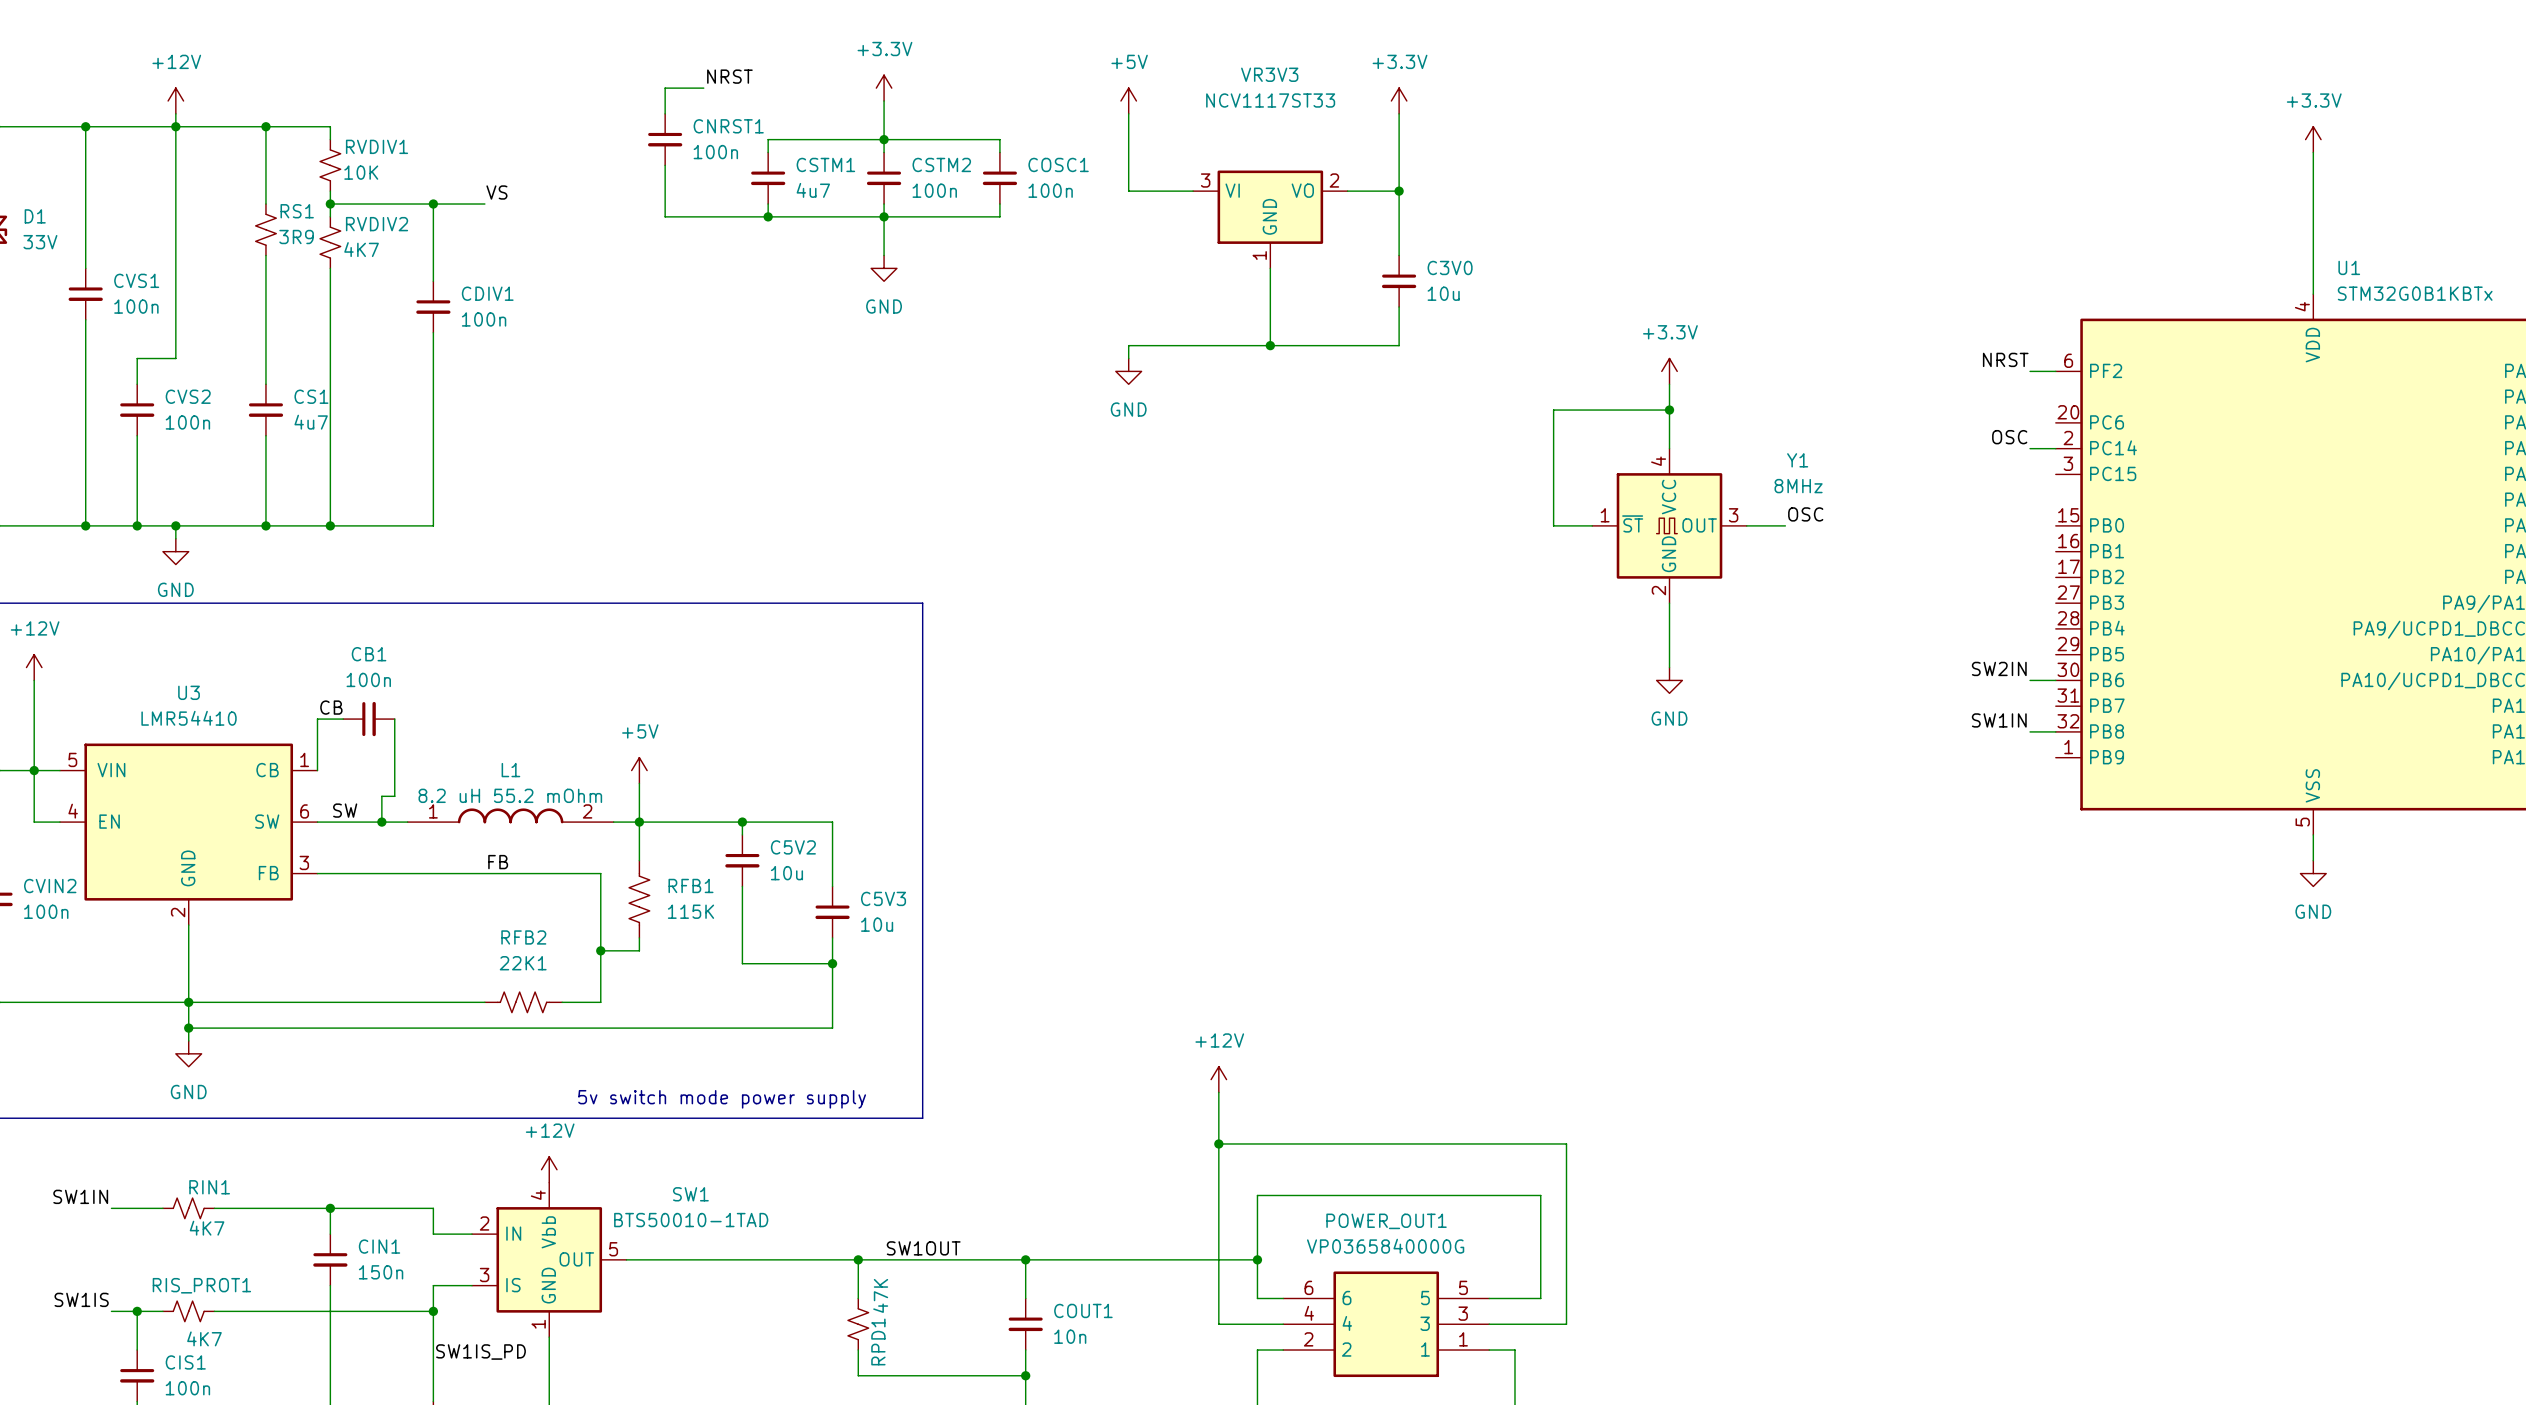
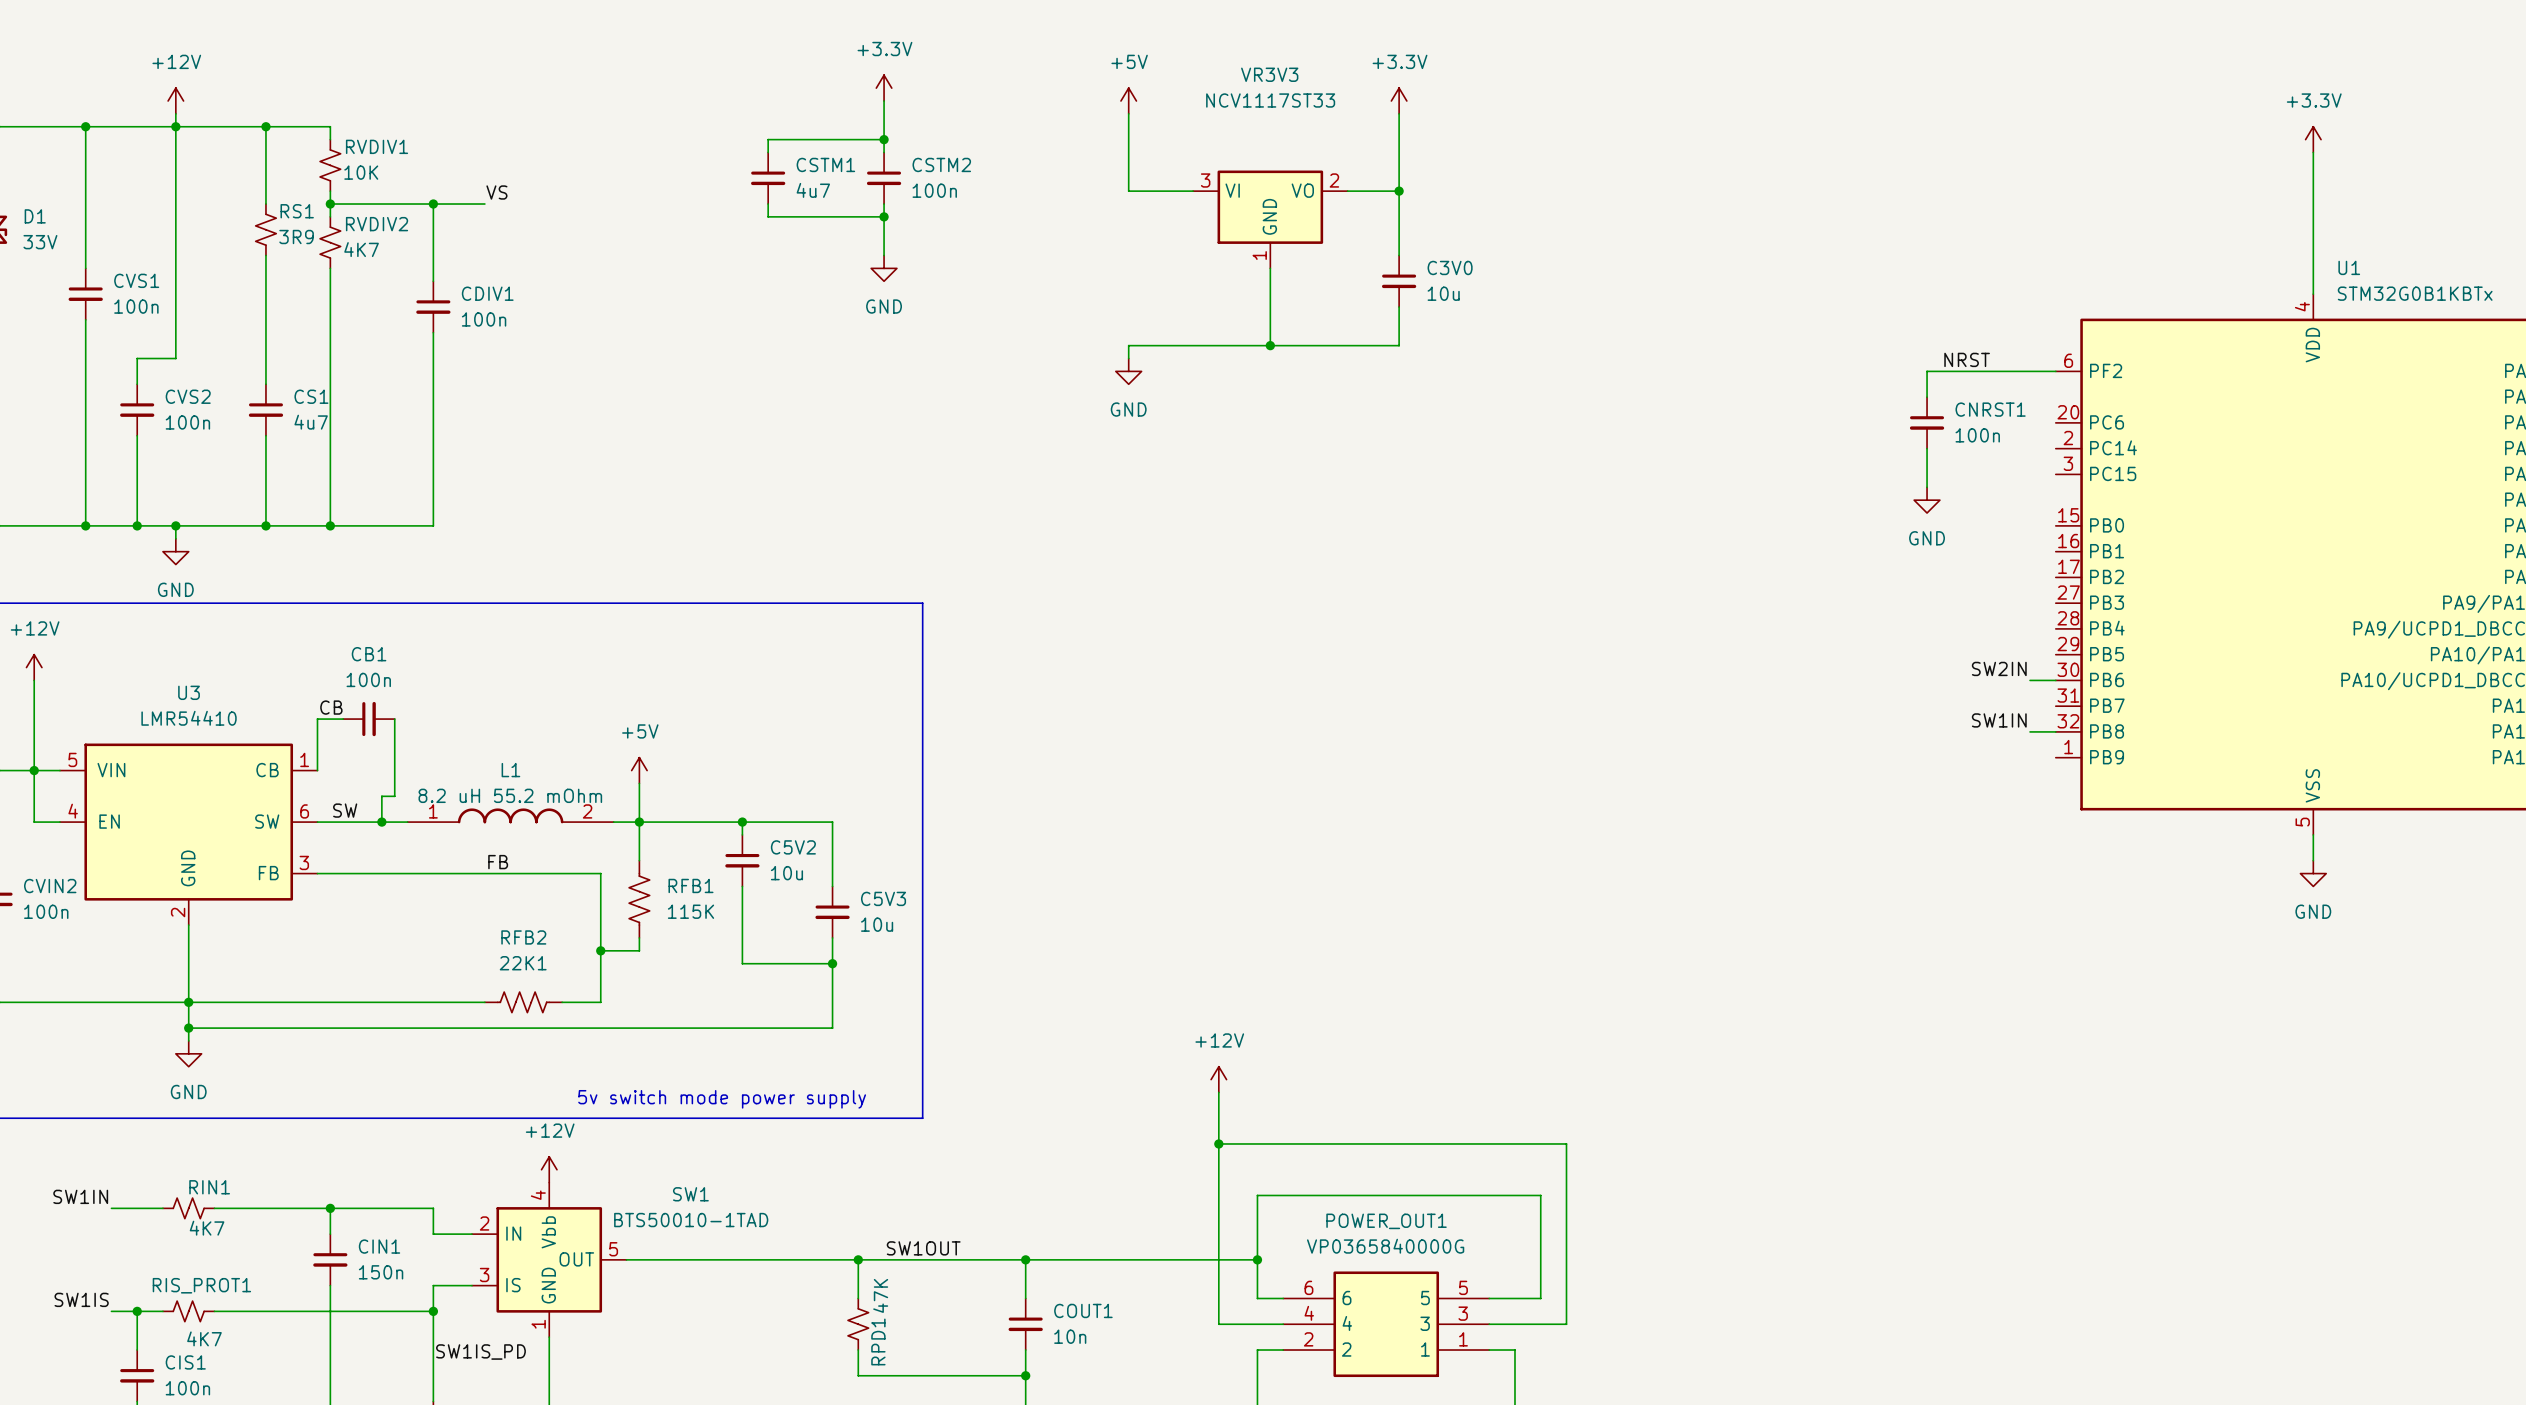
label: NRST (729, 76) -> none
wire: (703, 88) (665, 88) (665, 113) -> none
CNRST1 position: (665, 139) -> (1927, 422)
wire: (884, 139) (999, 139) (999, 152) -> none
wire: (665, 165) (665, 216) (768, 216) -> none
COSC1: 100n (999, 178) -> none
wire: (999, 204) (999, 216) (884, 216) -> none
junction: (768, 216) -> none
label position: NRST (2005, 359) -> NRST (1967, 359)
power symbol: +3.3V (1669, 371) -> none
wire: none -> (2030, 371) (1927, 371) (1927, 397)
wire: (1669, 384) (1669, 448) -> none
wire: (1669, 410) (1553, 410) (1553, 525) (1592, 525) -> none
junction: (1669, 410) -> none
label: OSC (2009, 437) -> none
wire: none -> (1927, 448) (1927, 487)
wire: (2030, 448) (2055, 448) -> none
power symbol: none -> GND (1927, 500)
label: OSC (1805, 514) -> none
Y1: 8MHz (1669, 525) -> none
wire: (1746, 525) (1785, 525) -> none
wire: (1669, 603) (1669, 667) -> none
power symbol: GND (1669, 680) -> none

